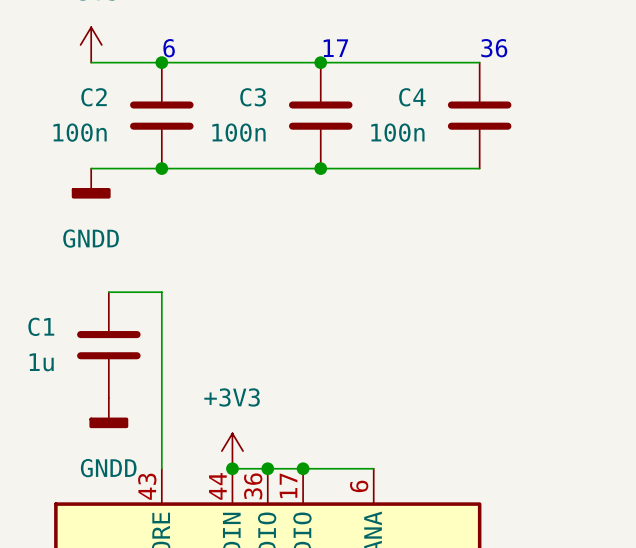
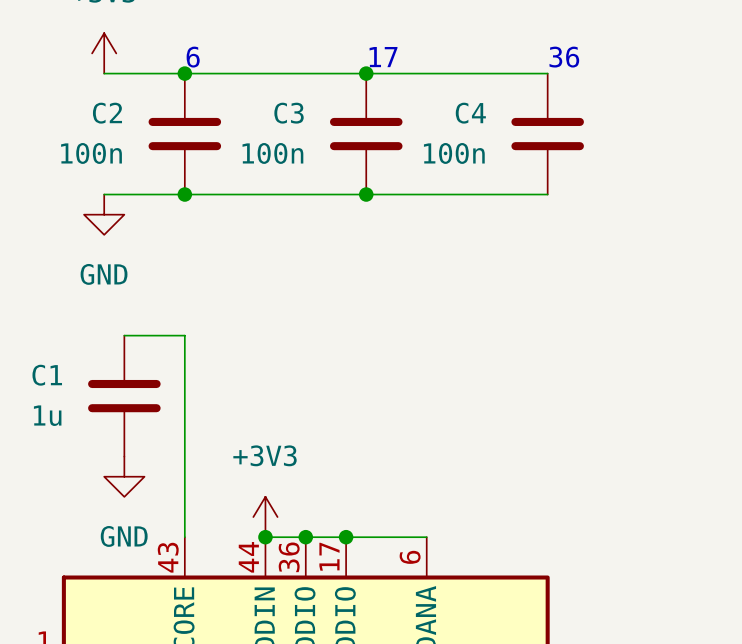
power symbol: GNDD (91, 183) -> GND (104, 214)
power symbol: GNDD (108, 413) -> GND (124, 476)

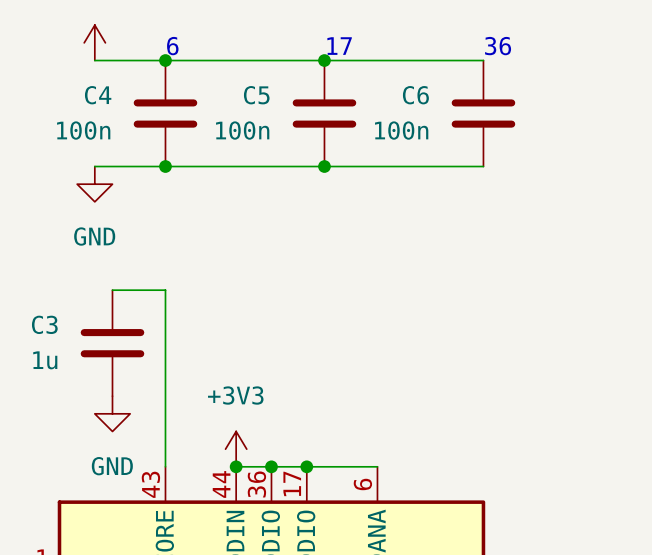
C2 name: C2 (107, 113) -> C4 (98, 95)
C3 name: C3 (289, 113) -> C5 (256, 95)
C4 name: C4 (470, 113) -> C6 (415, 95)
C1 name: C1 (47, 375) -> C3 (44, 324)

